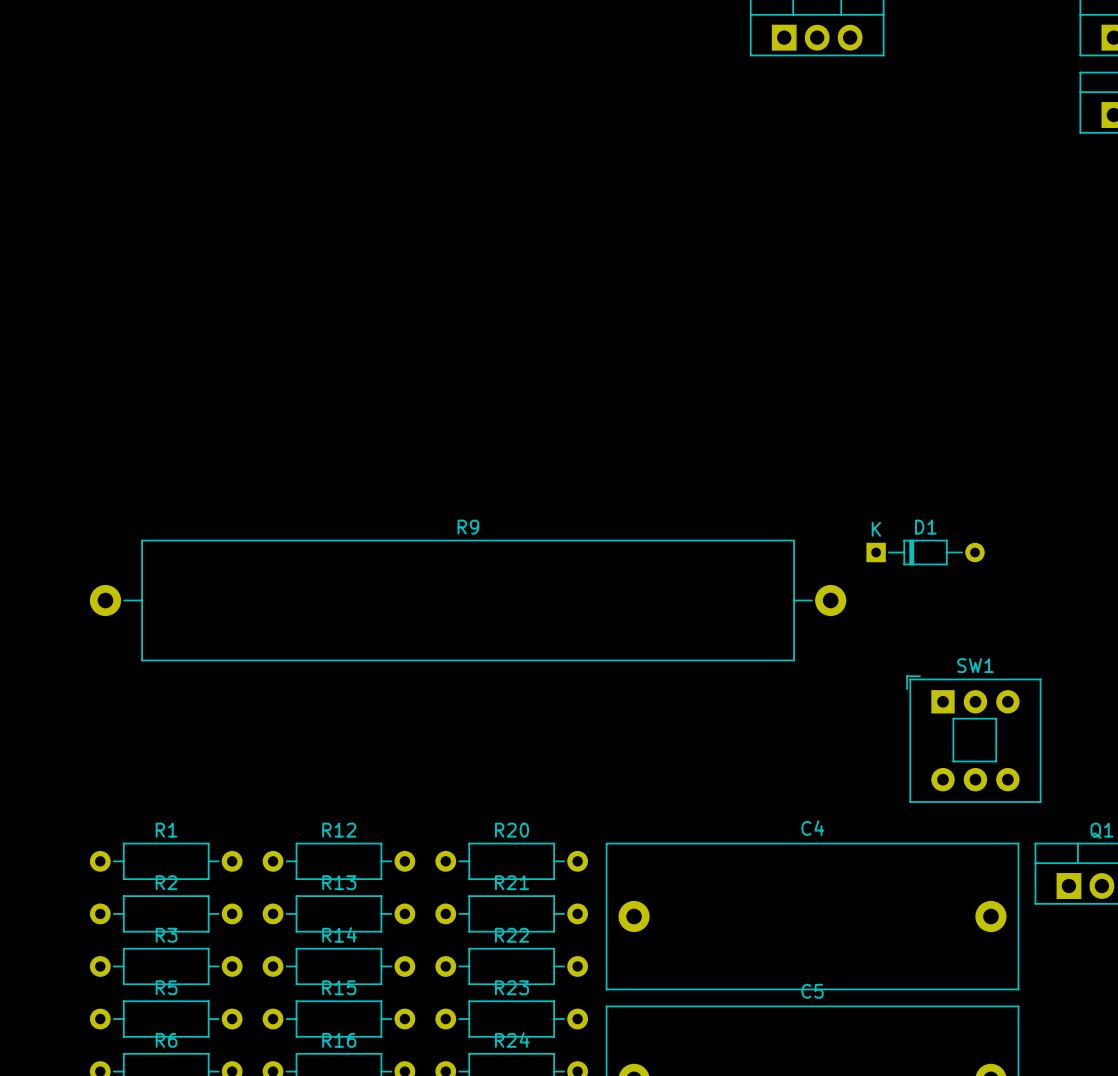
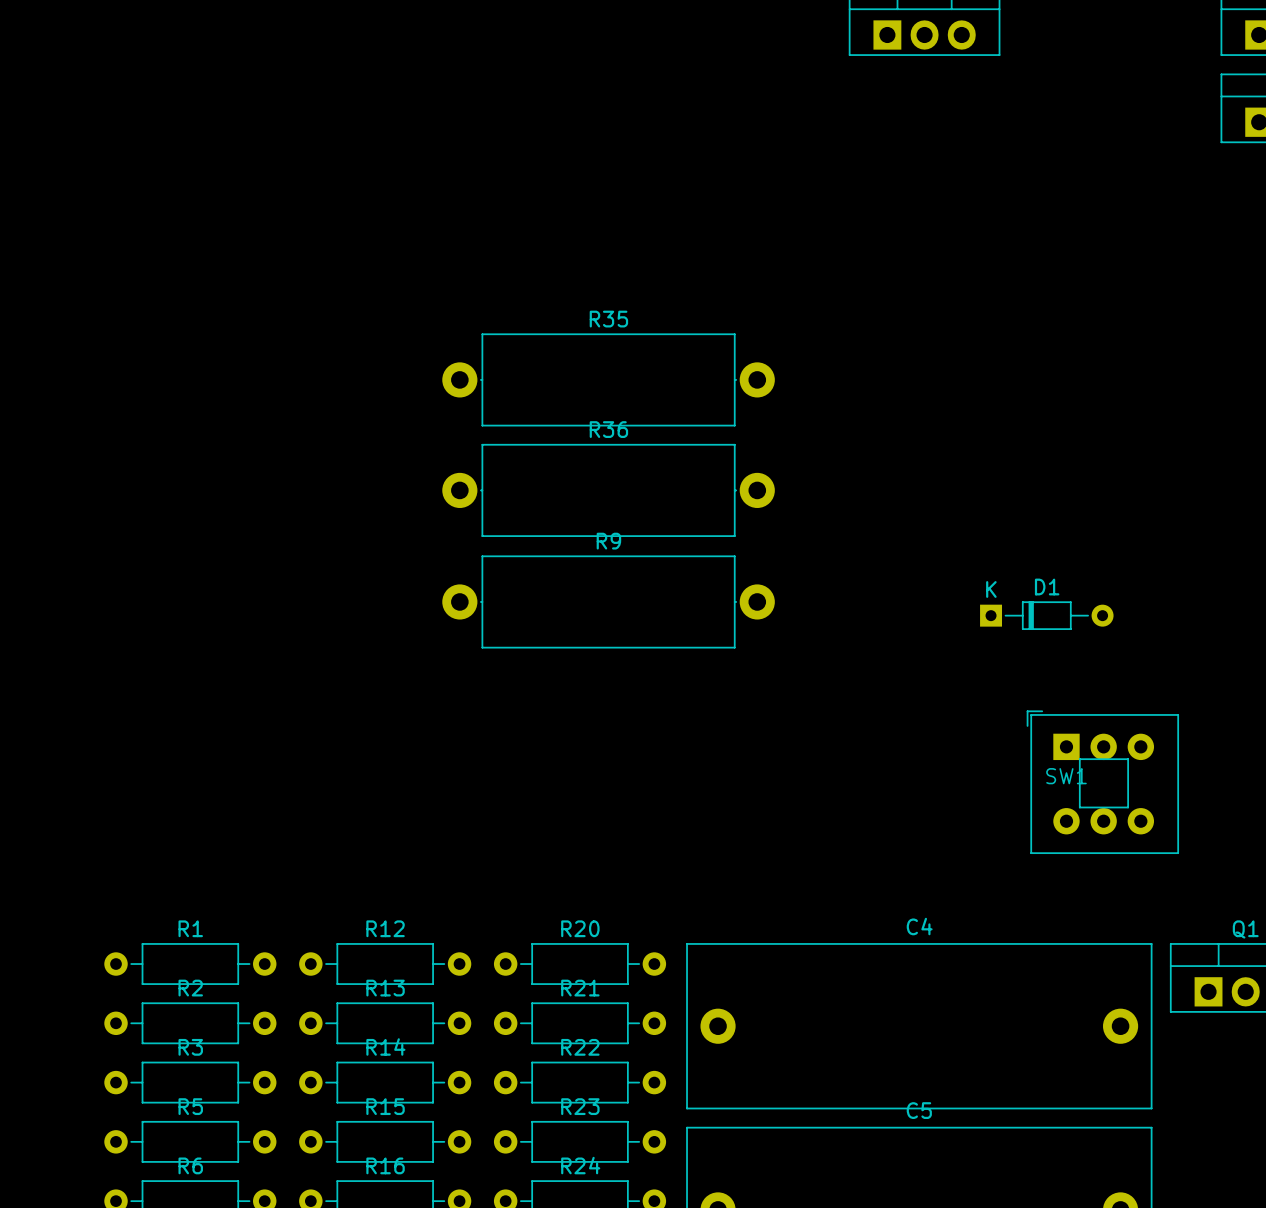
R35: none -> (608, 379)
R36: none -> (608, 490)
R9 footprint: [89, 539, 847, 662] -> [442, 555, 775, 649]
SW1 name position: SW1 (975, 665) -> SW1 (1066, 776)
SW1 footprint: [906, 675, 1042, 803] -> [1026, 710, 1180, 855]

